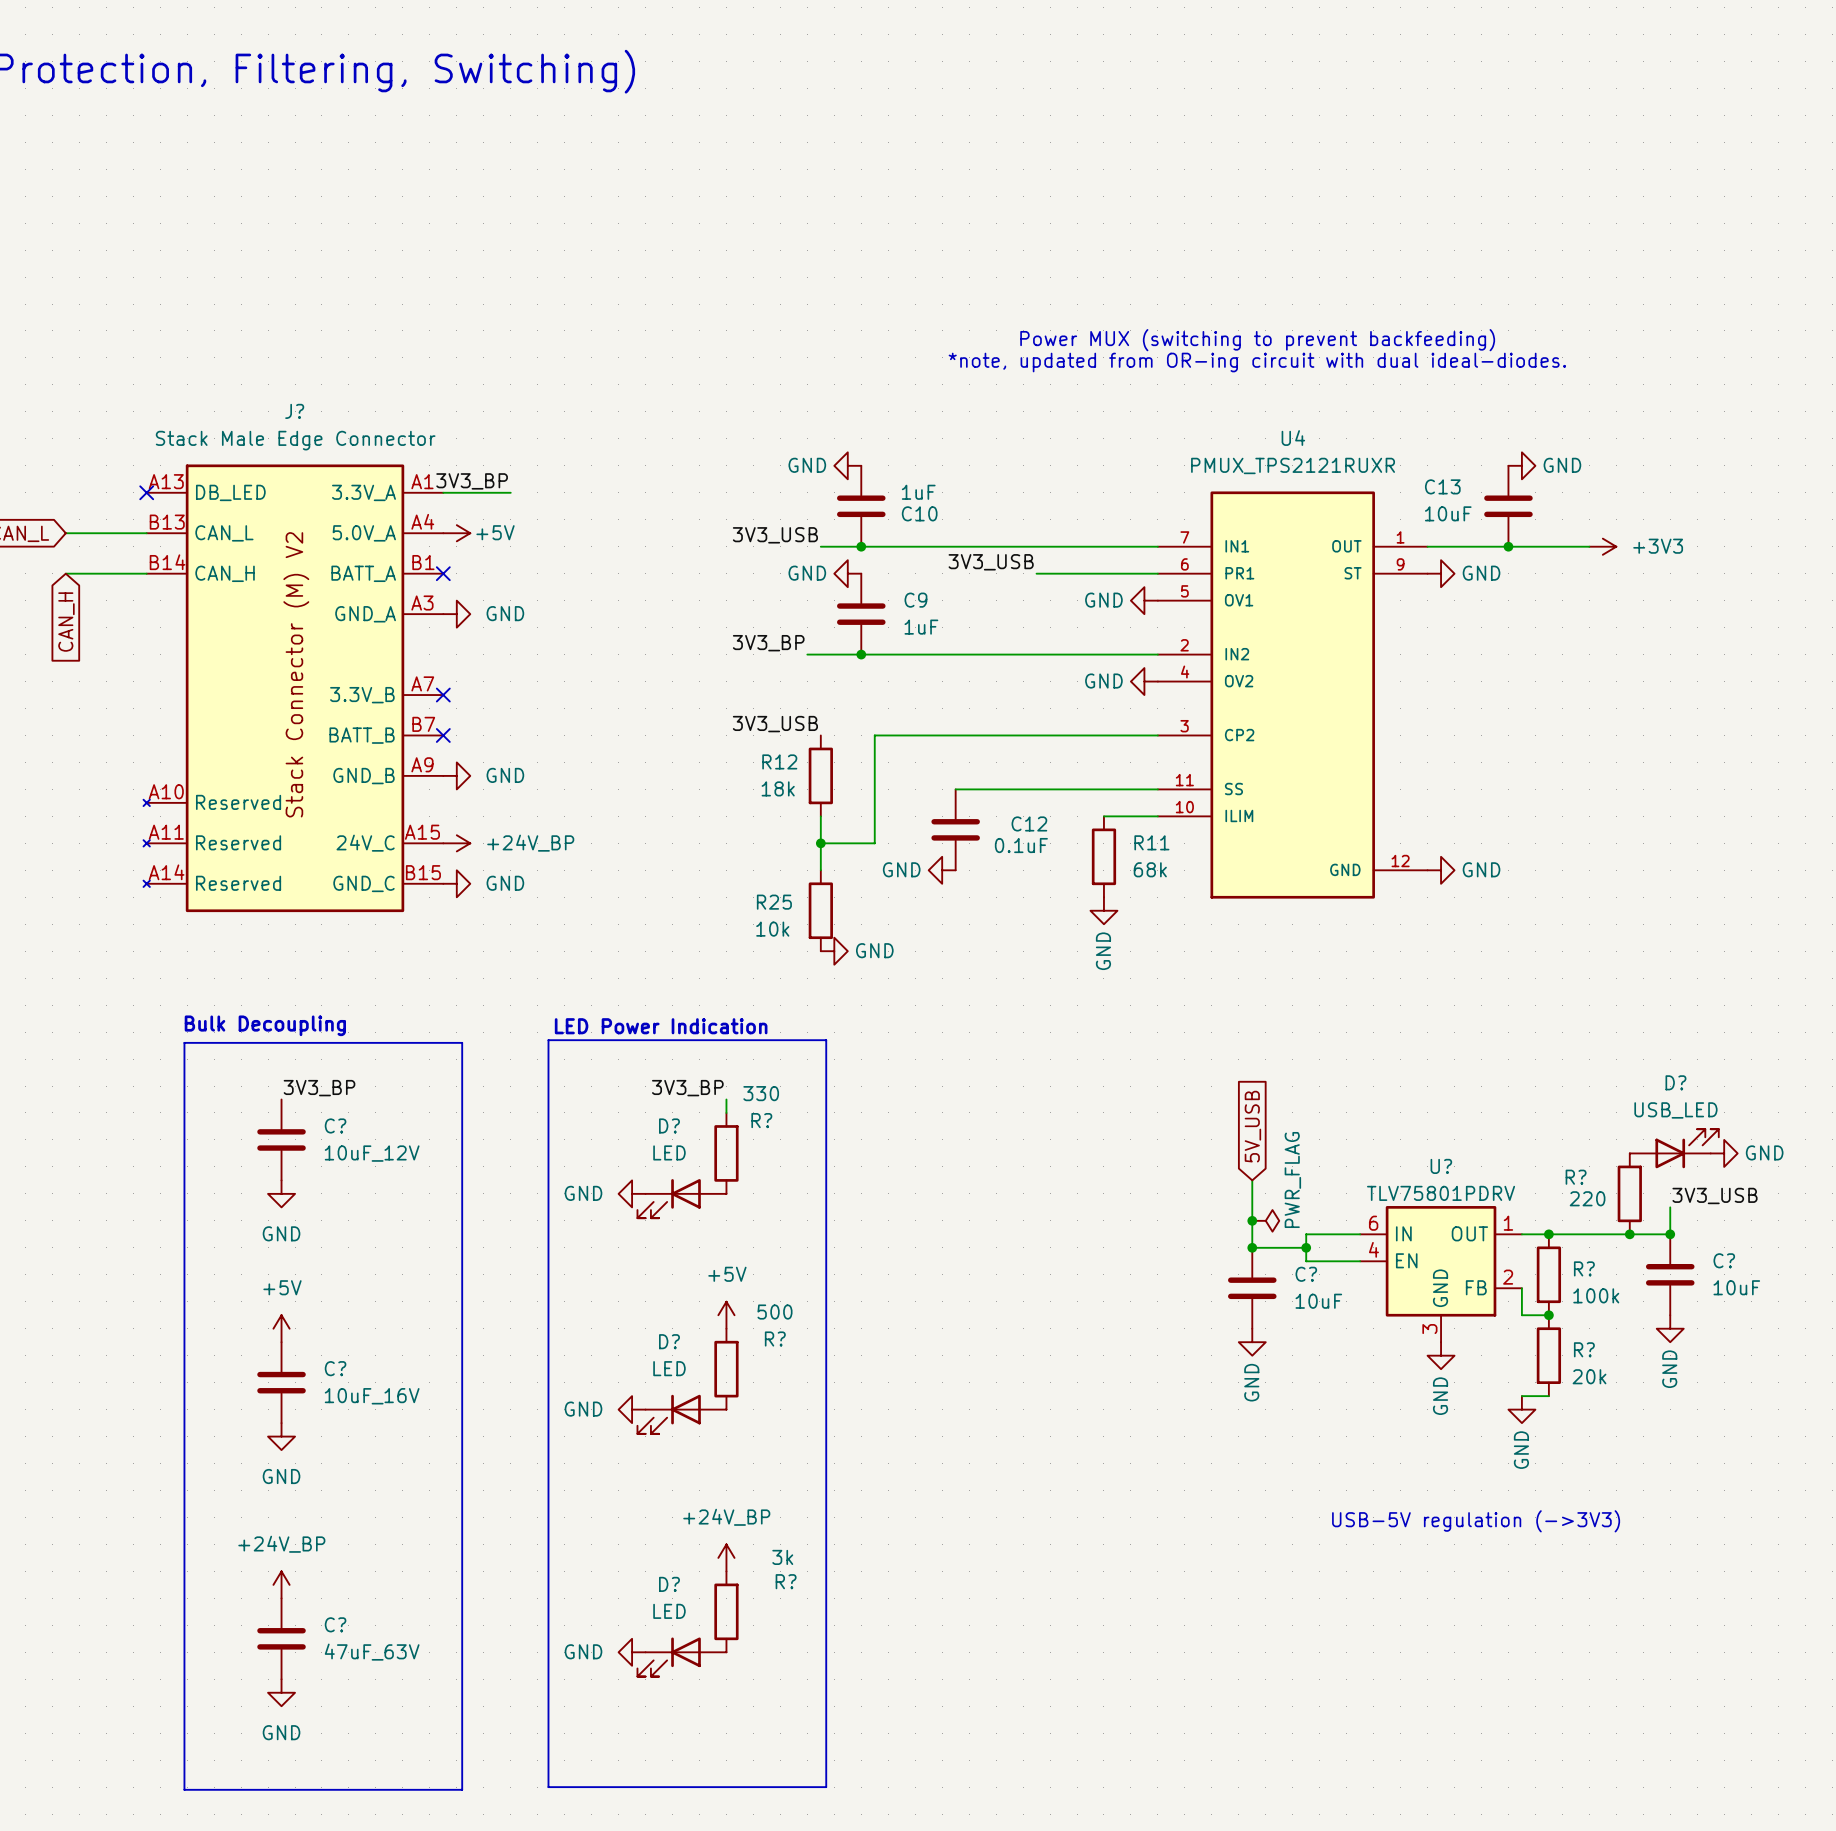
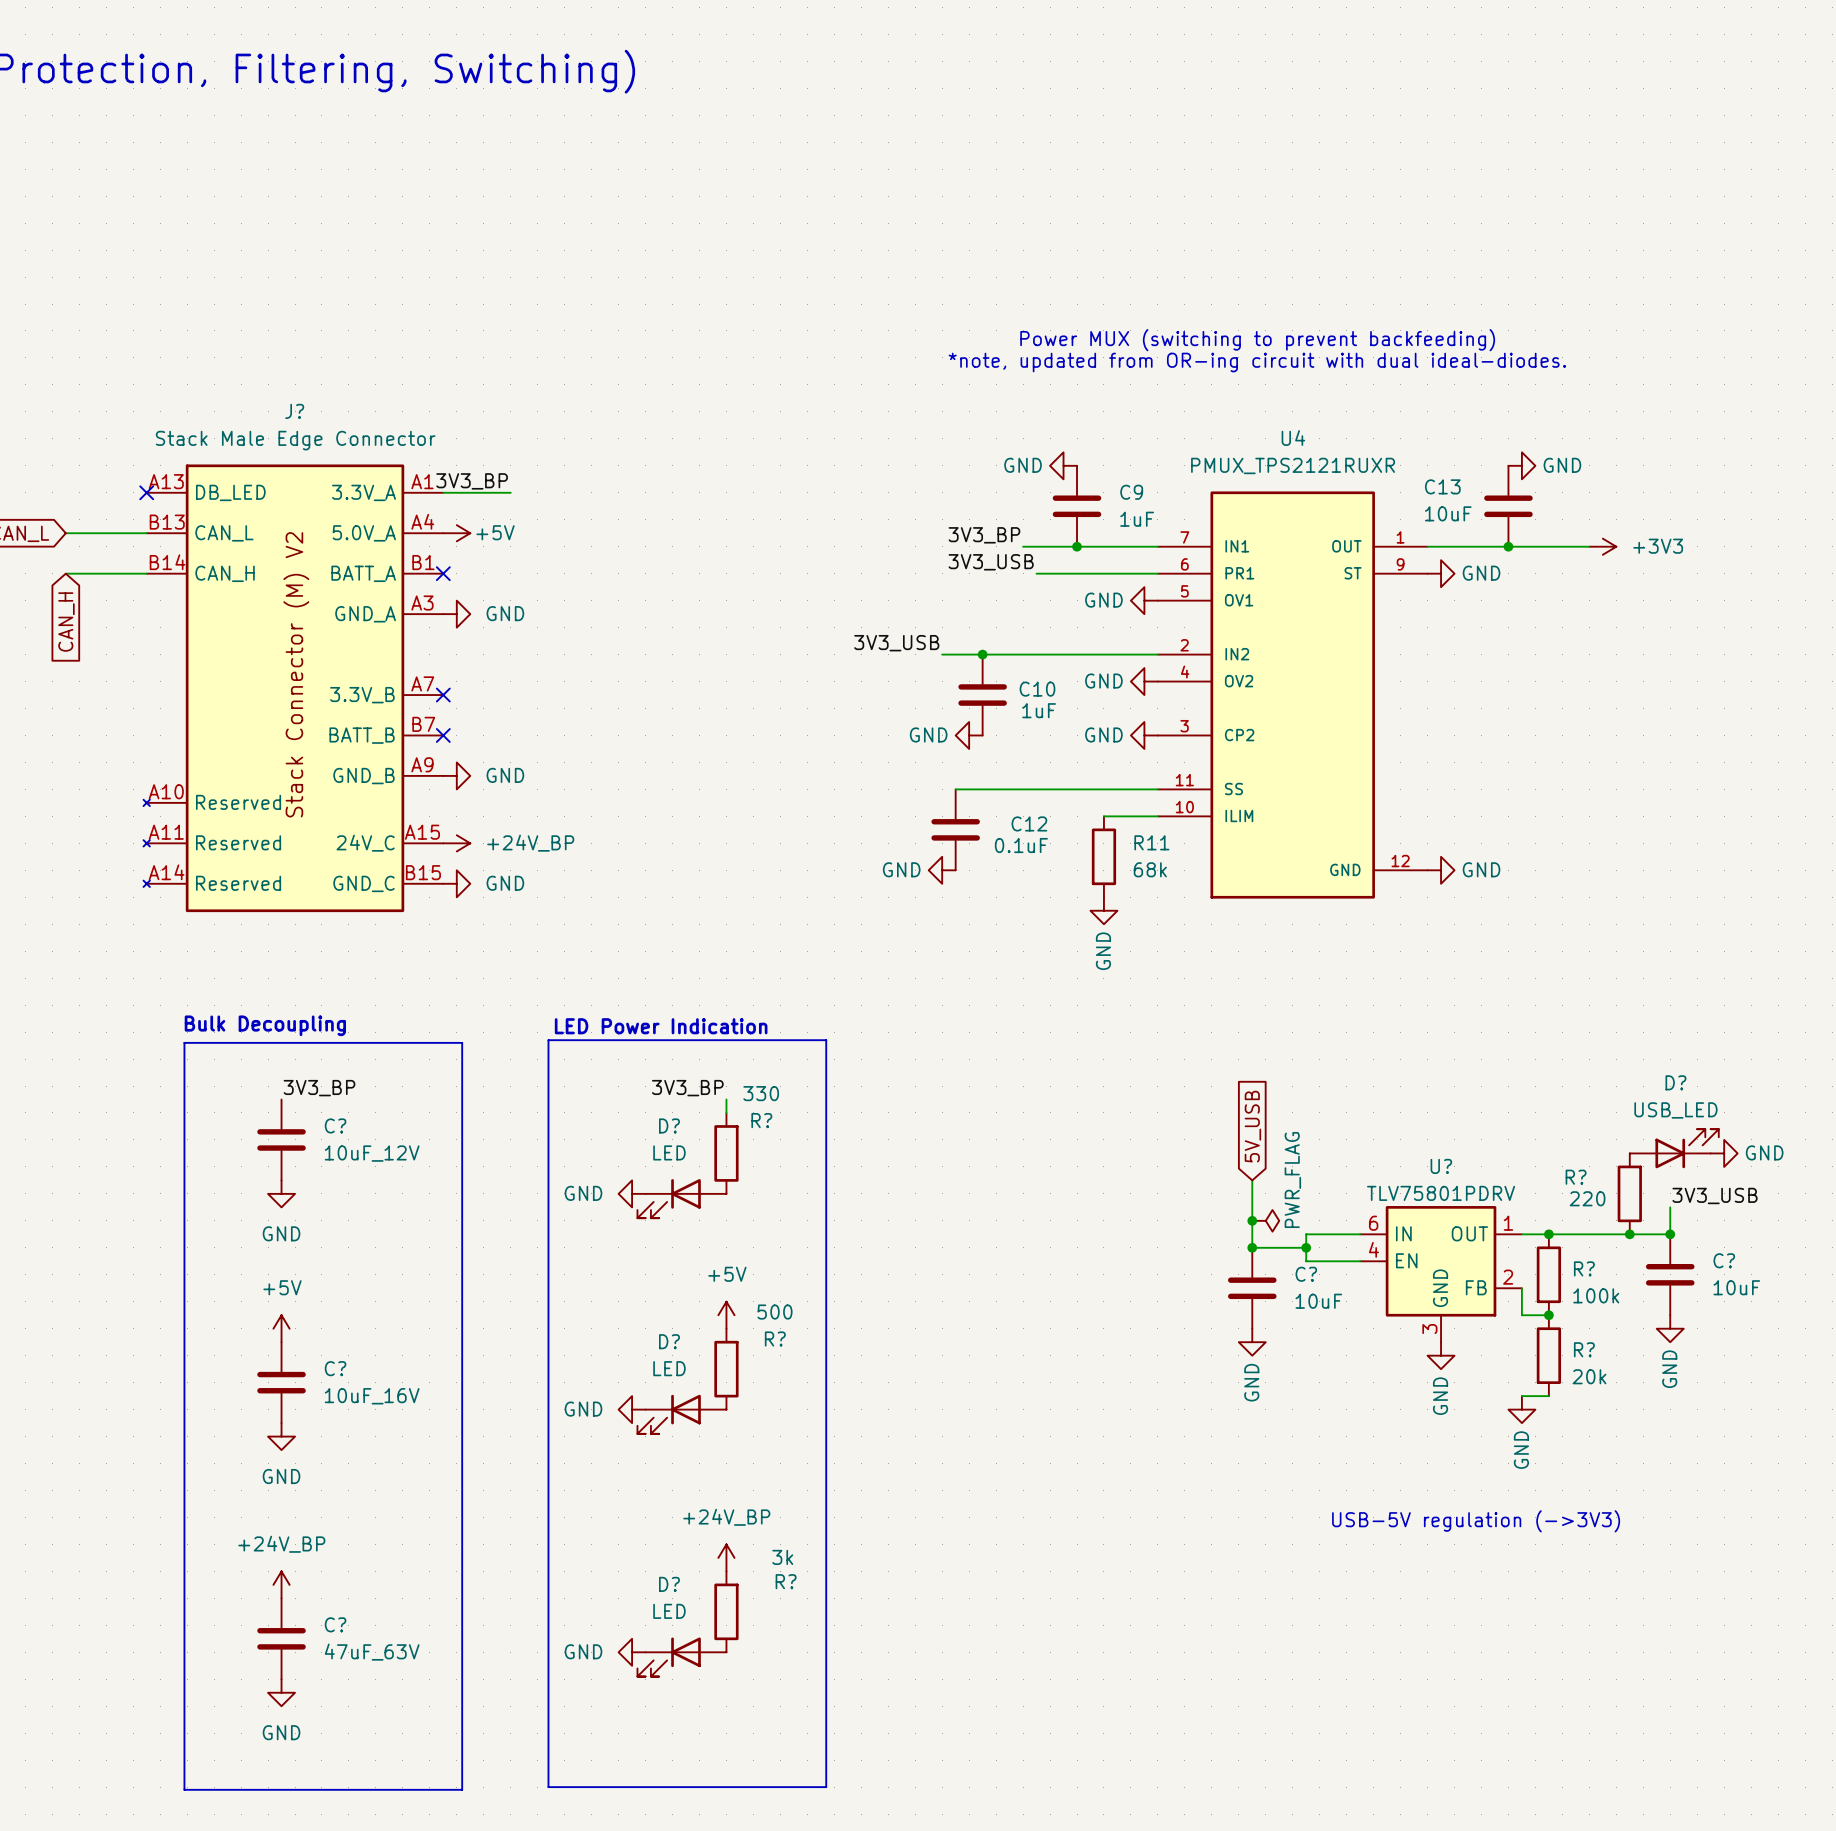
power symbol: GND (847, 465) -> none
power symbol: none -> GND (1063, 465)
C10 value position: 1uF (918, 492) -> 1uF (1039, 710)
C10 position: (861, 506) -> (982, 695)
C10 name position: C10 (919, 513) -> C10 (1037, 689)
label: 3V3_USB (775, 535) -> none
wire: (820, 546) (1023, 546) -> none
junction: (861, 546) -> none
junction: none -> (1077, 546)
power symbol: GND (847, 573) -> none
C9 position: (861, 614) -> (1077, 506)
label position: 3V3_BP (768, 643) -> 3V3_BP (984, 535)
label: none -> 3V3_USB (896, 643)
wire: (807, 654) (942, 654) -> none
junction: (861, 654) -> none
junction: none -> (982, 654)
label: 3V3_USB (775, 724) -> none
power symbol: none -> GND (969, 735)
power symbol: none -> GND (1144, 735)
wire: (1157, 735) (874, 735) (874, 843) (820, 843) -> none
R12: 18k (820, 775) -> none
wire: (820, 816) (820, 870) -> none
junction: (820, 843) -> none
R25: 10k (820, 910) -> none
power symbol: GND (834, 951) -> none

